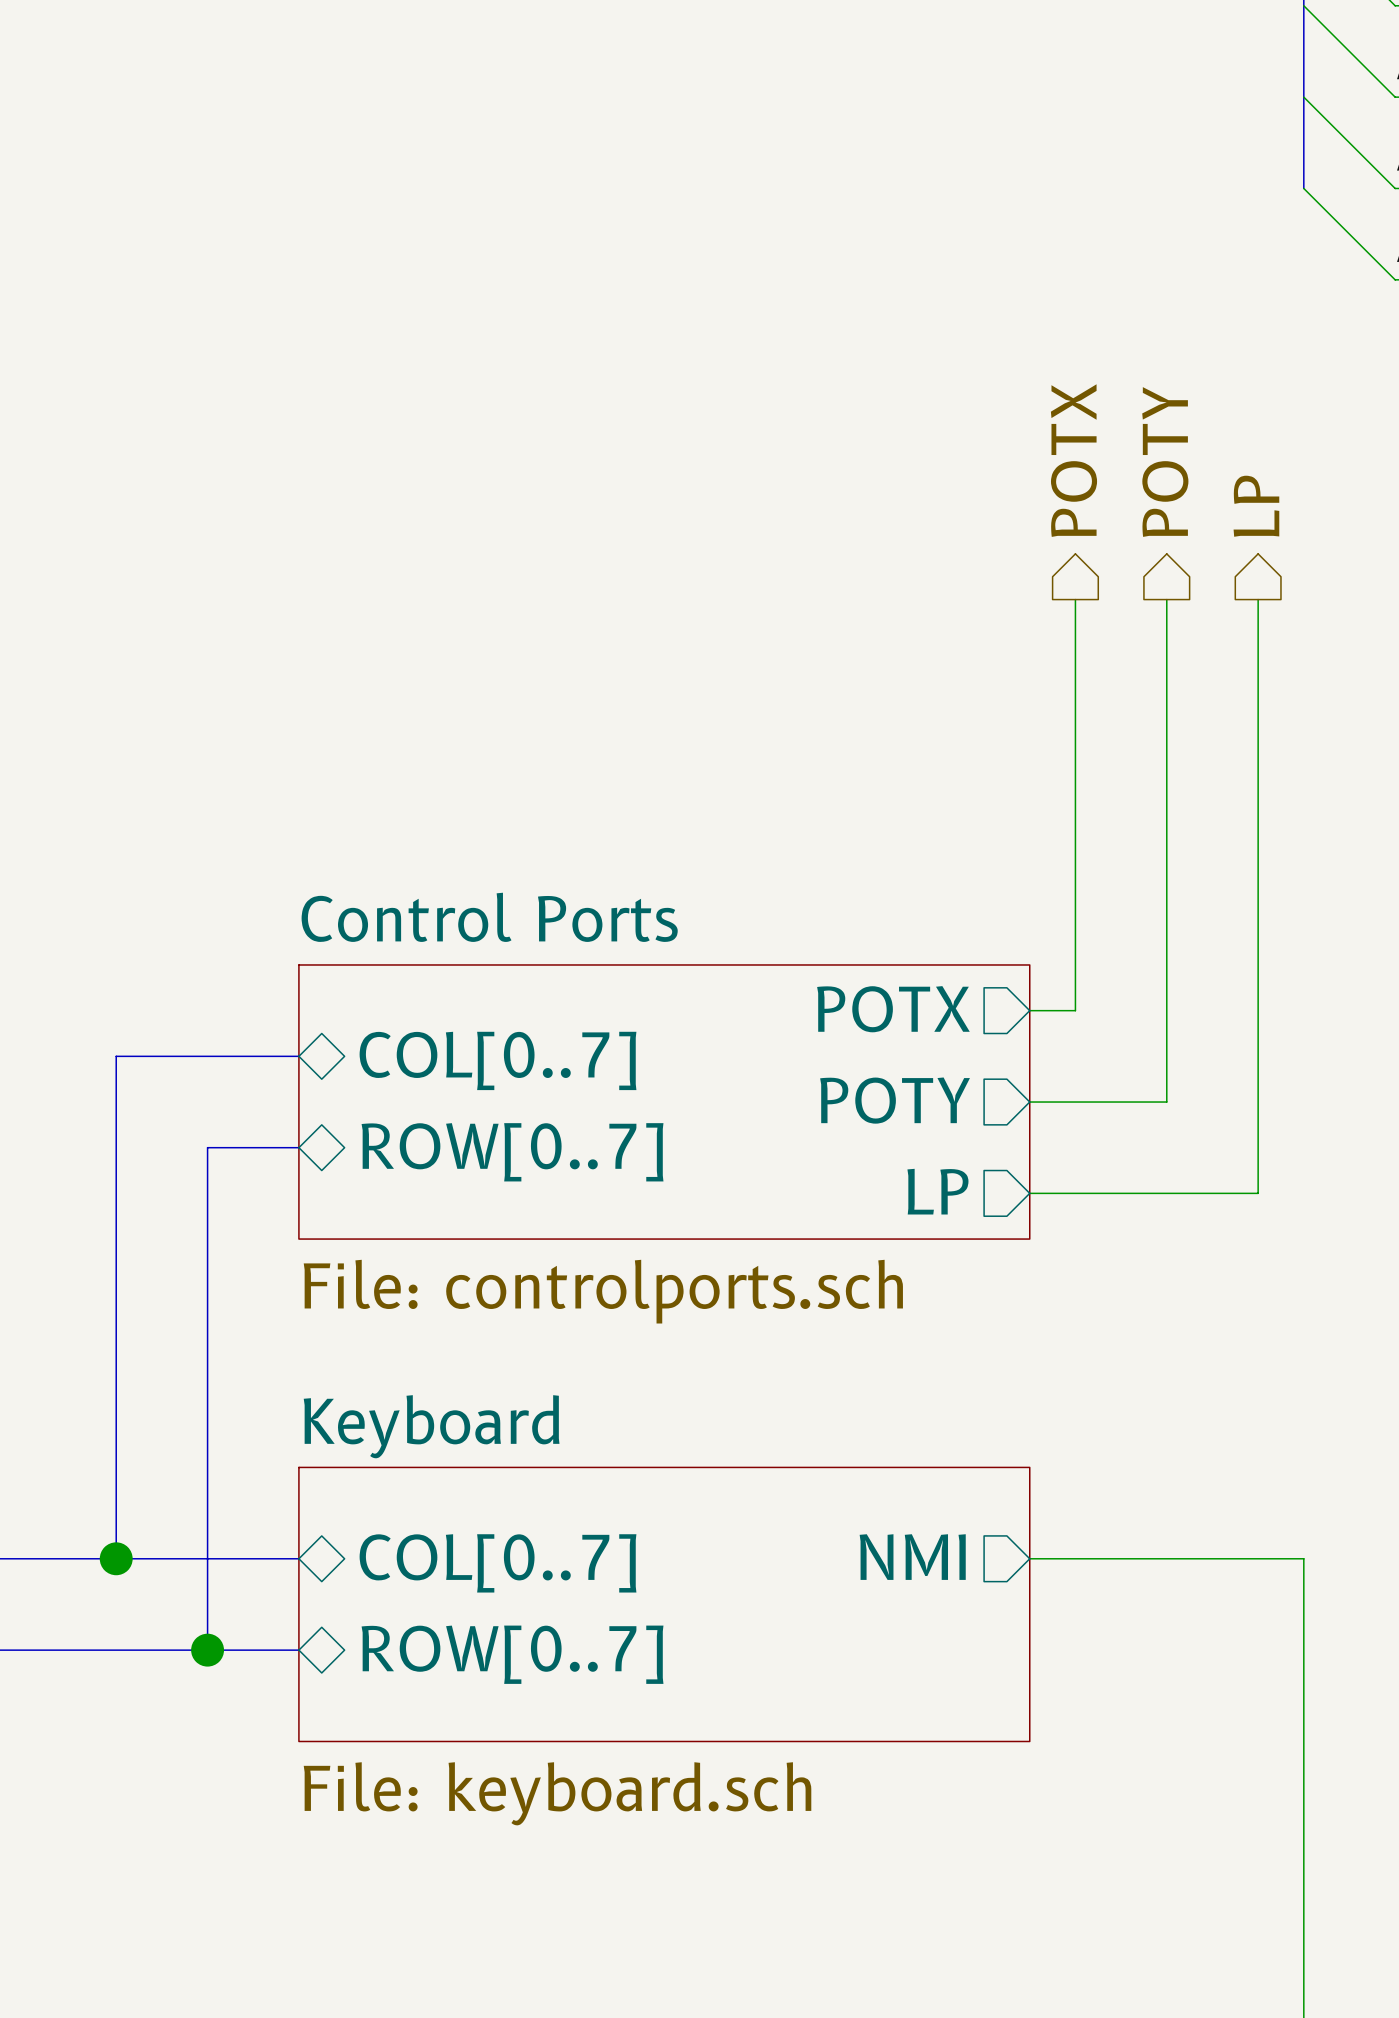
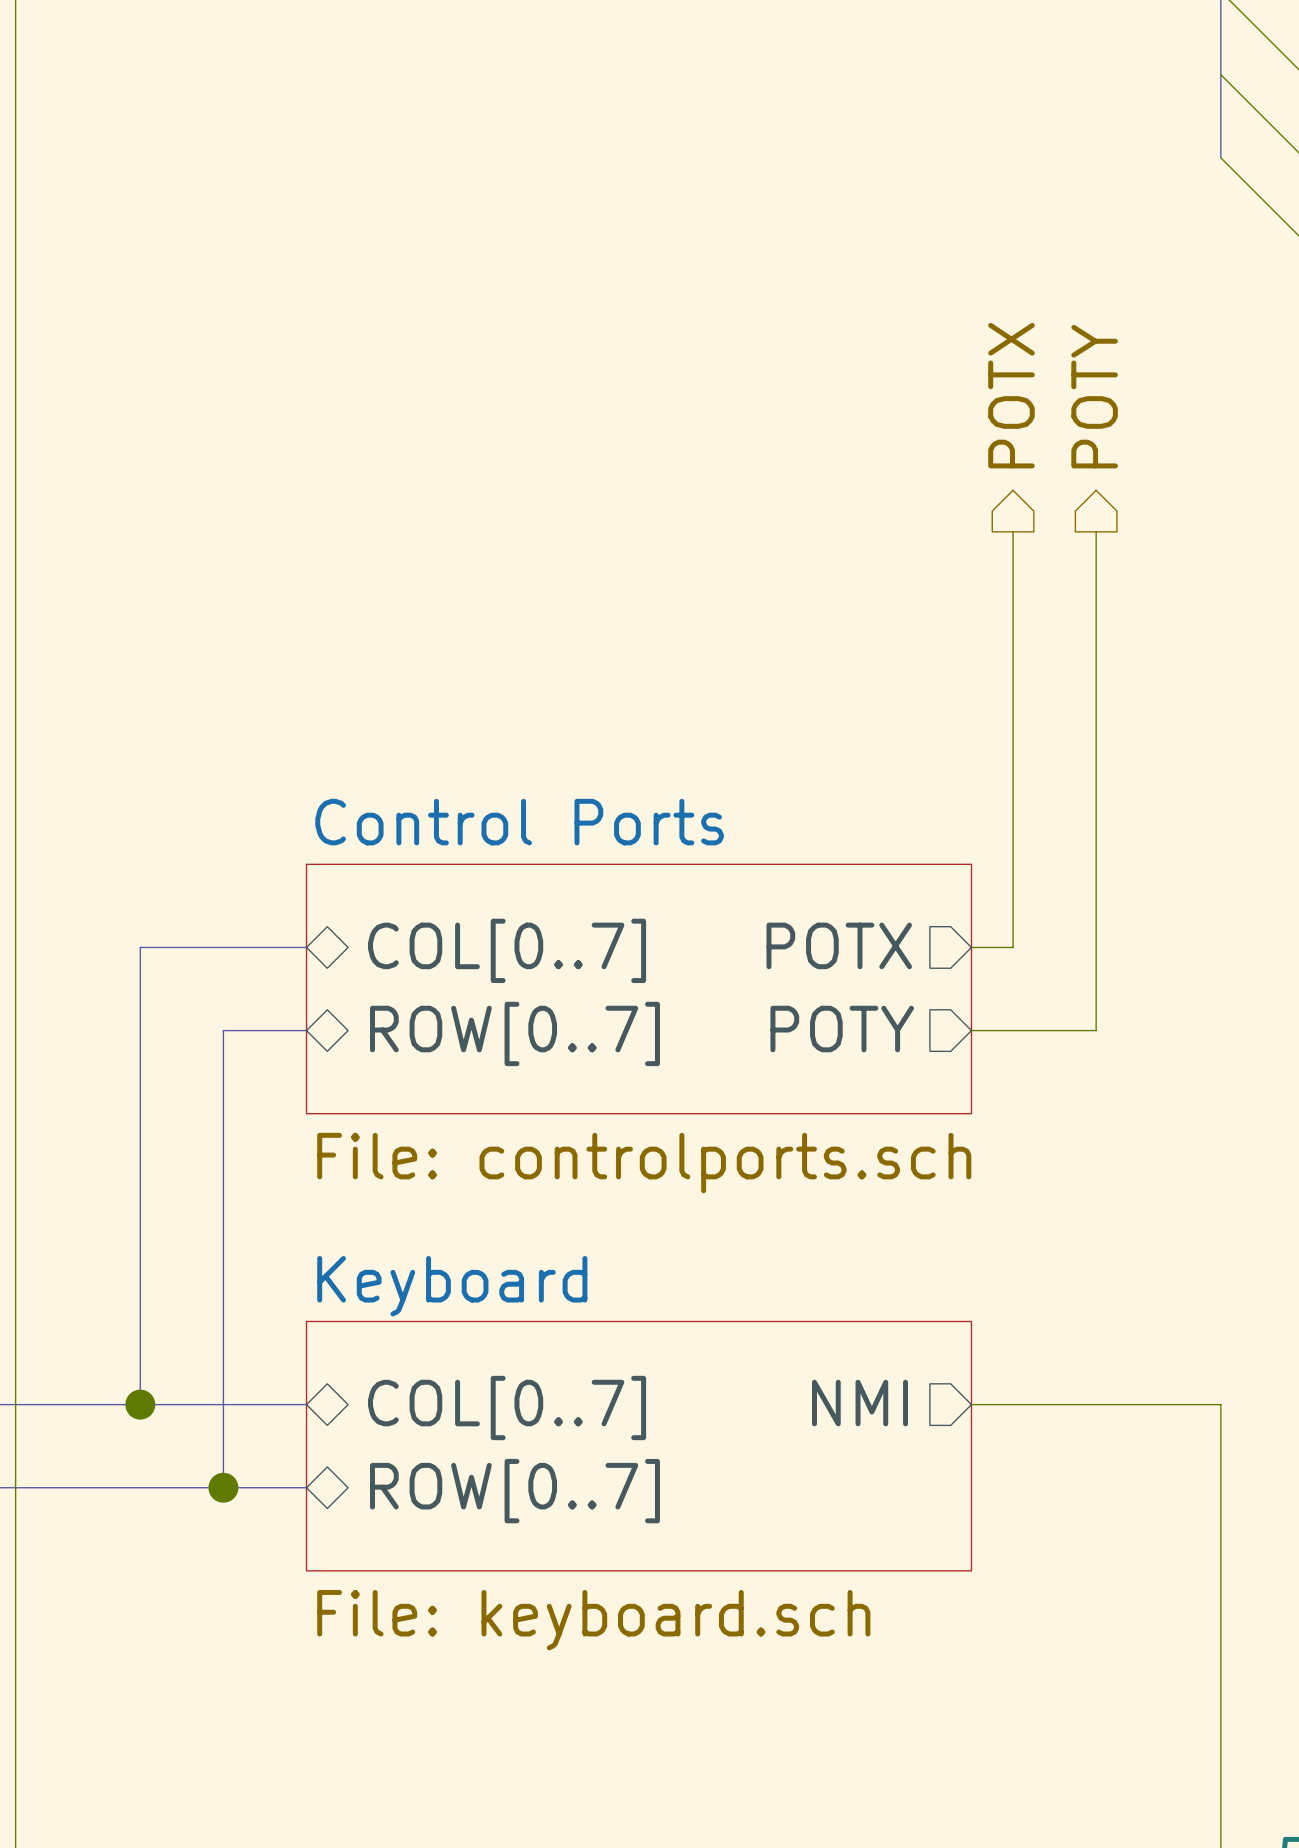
hierarchical label: LP (1256, 506) -> none
wire: (1258, 599) (1258, 1193) (1029, 1193) -> none
sheet pin position: POTX (893, 1009) -> POTX (839, 945)
wire: (1029, 1010) (1075, 1010) -> (971, 947) (1013, 947) (1013, 905)
sheet pin position: POTY (895, 1100) -> POTY (842, 1029)
wire: (1029, 1102) (1166, 1102) -> (971, 1030) (1096, 1030) (1096, 989)
sheet pin: LP (937, 1191) -> none

